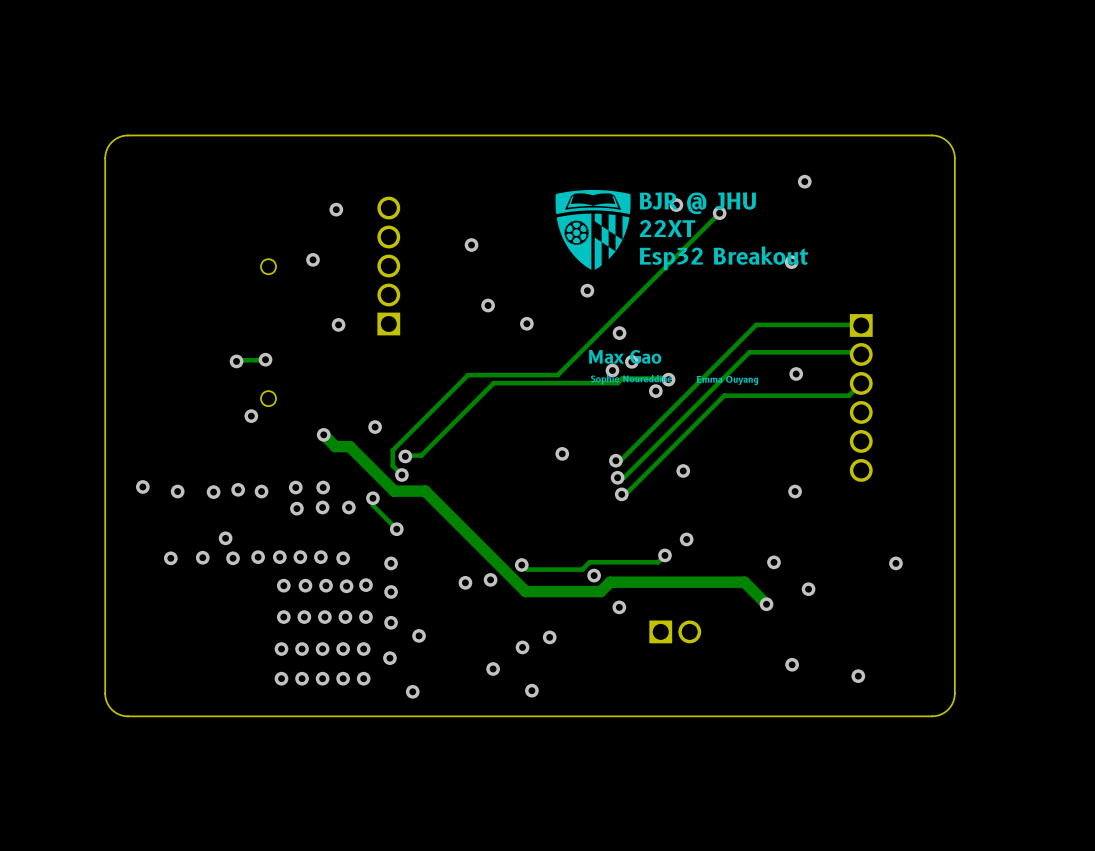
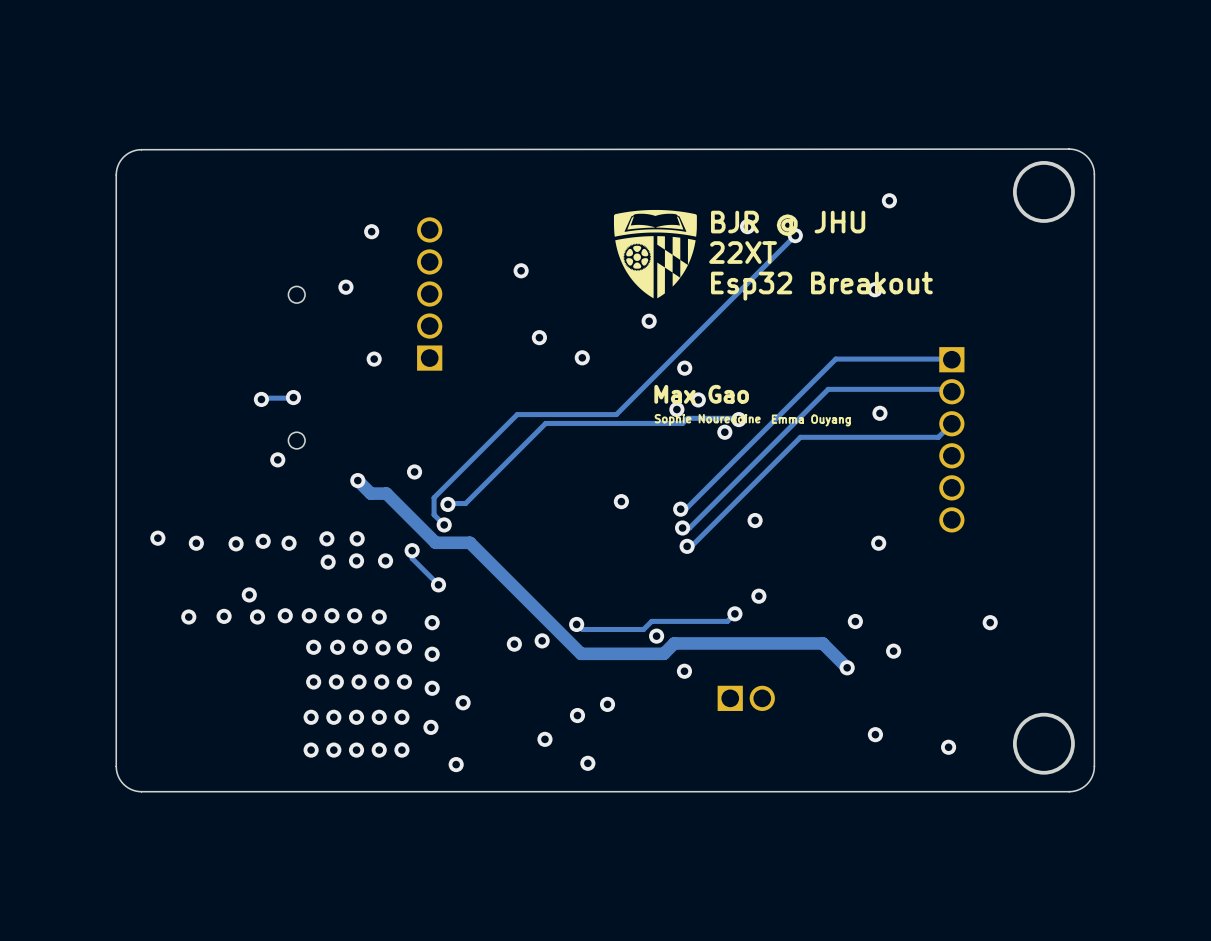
board edge: (128, 135) (932, 135) (946, 140) (952, 148) (954, 158) (954, 693) (953, 701) (948, 709) (941, 714) (932, 716) -> (141, 149) (1069, 149) (1084, 154) (1091, 163) (1094, 174) (1094, 769) (1088, 782) (1077, 790) (1030, 791)
round board edge: none -> [1013, 161, 1075, 223]
round board edge: none -> [1013, 712, 1075, 775]

